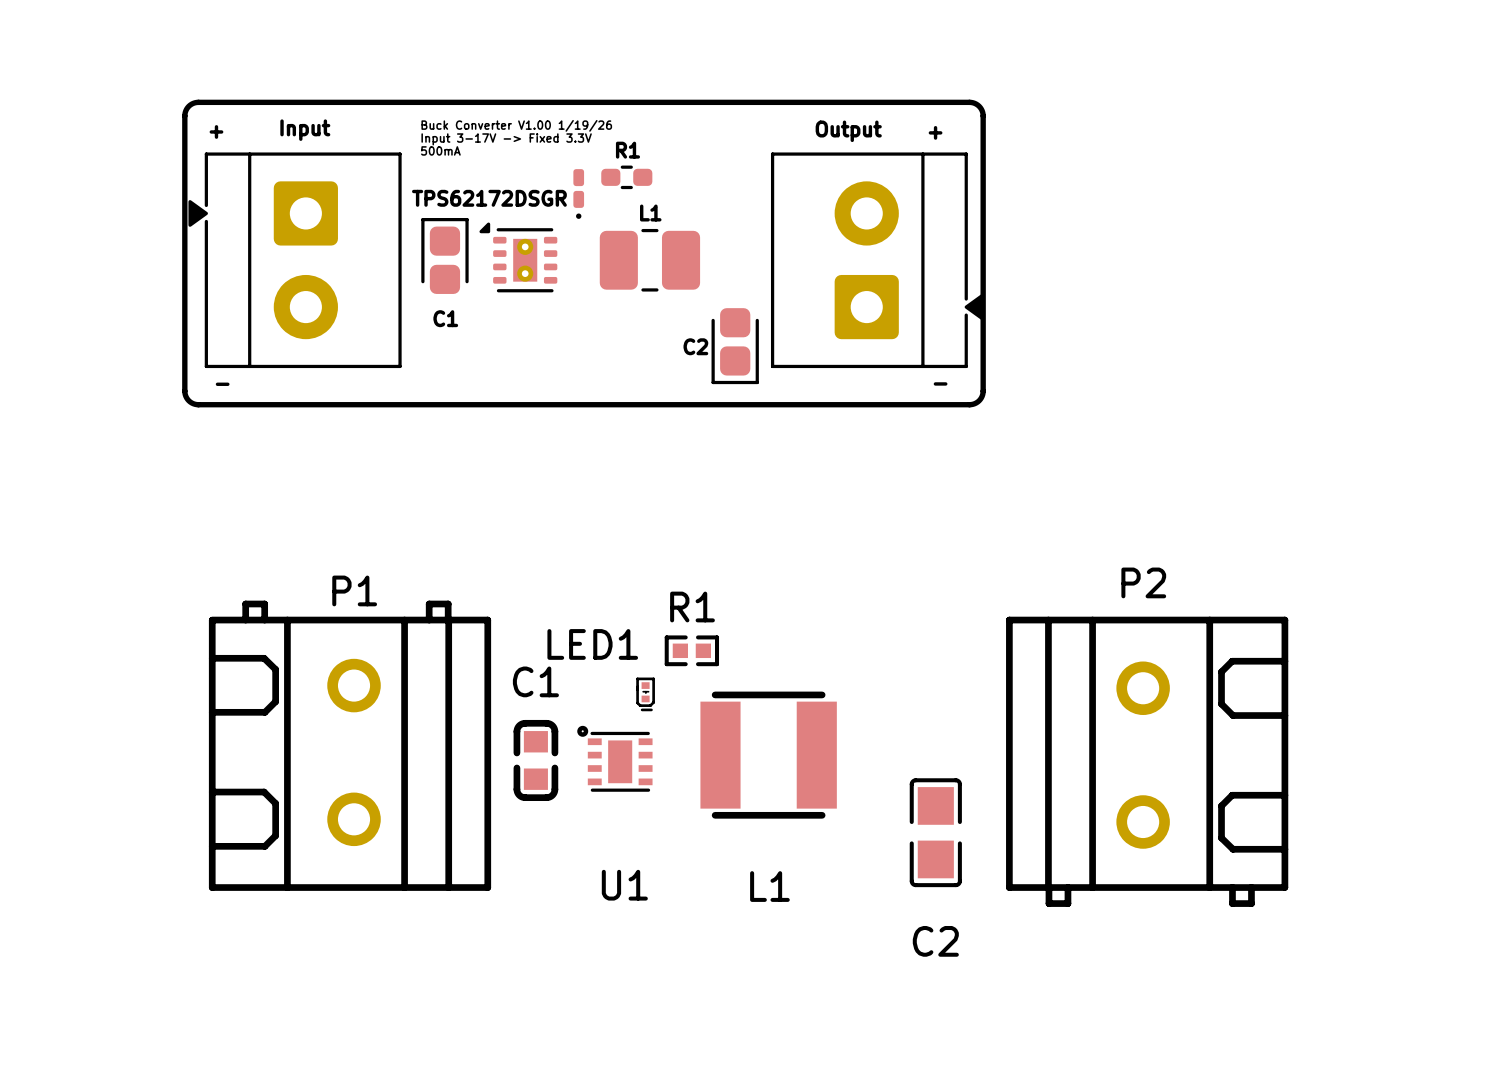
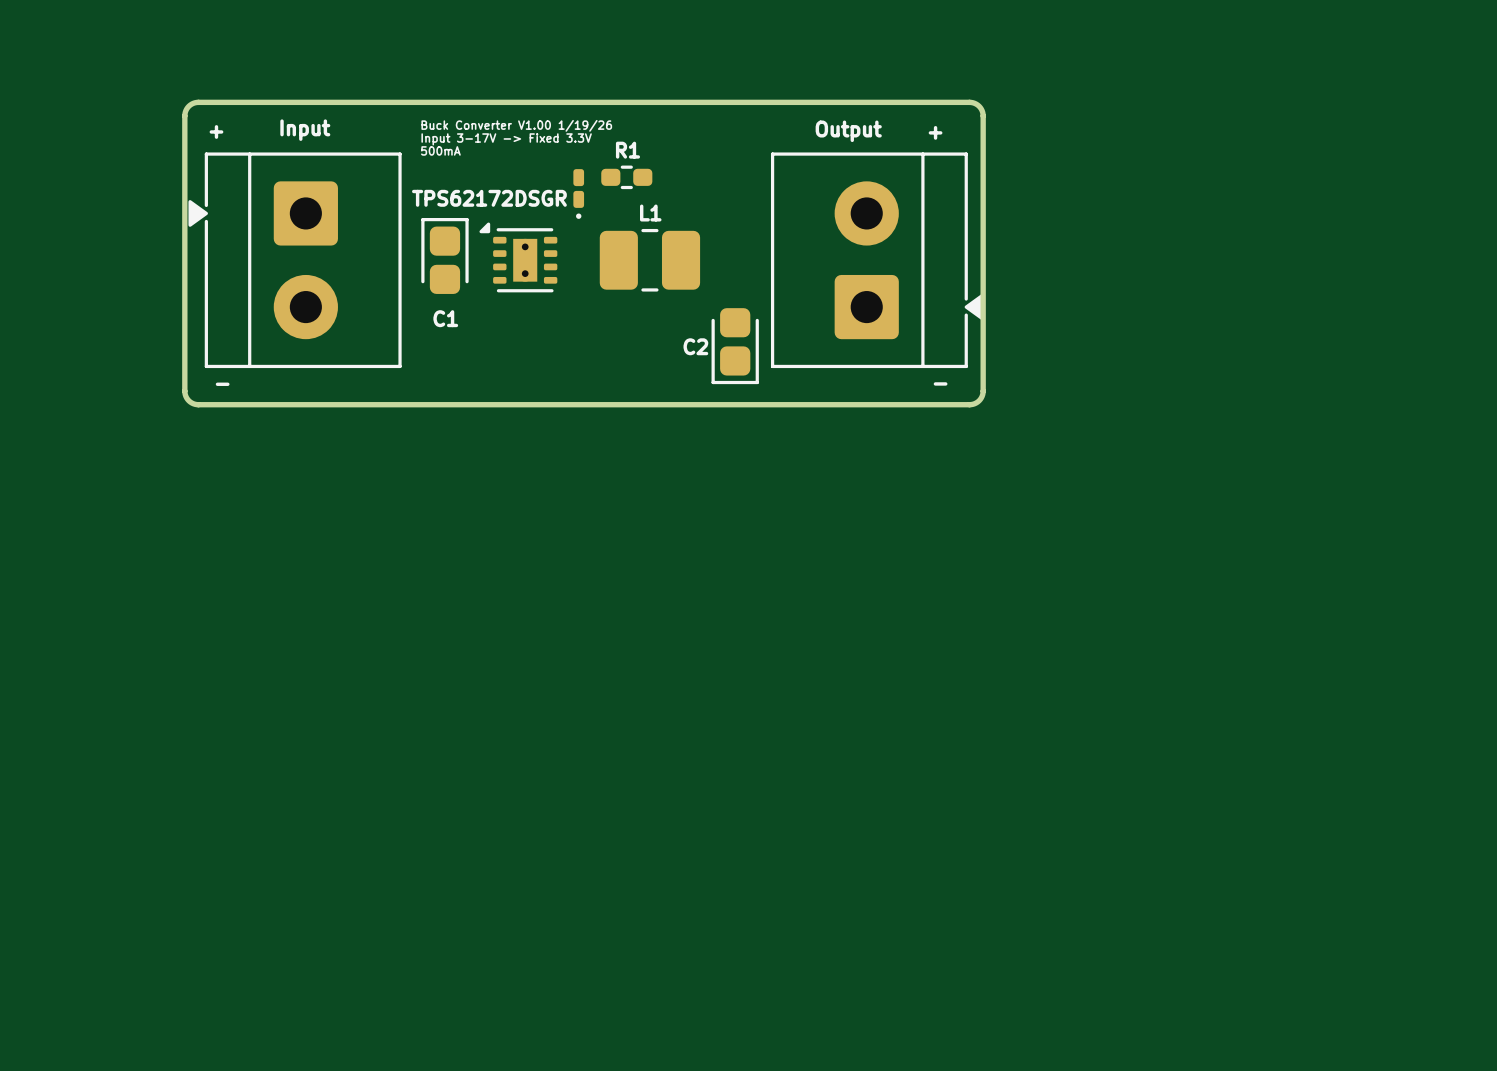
R1: (691, 650) -> none
LED1: (645, 694) -> none
P1: (350, 745) -> none
L1: (768, 755) -> none
U1: (614, 758) -> none
C1: (535, 760) -> none
P2: (1147, 761) -> none
C2: (935, 832) -> none

